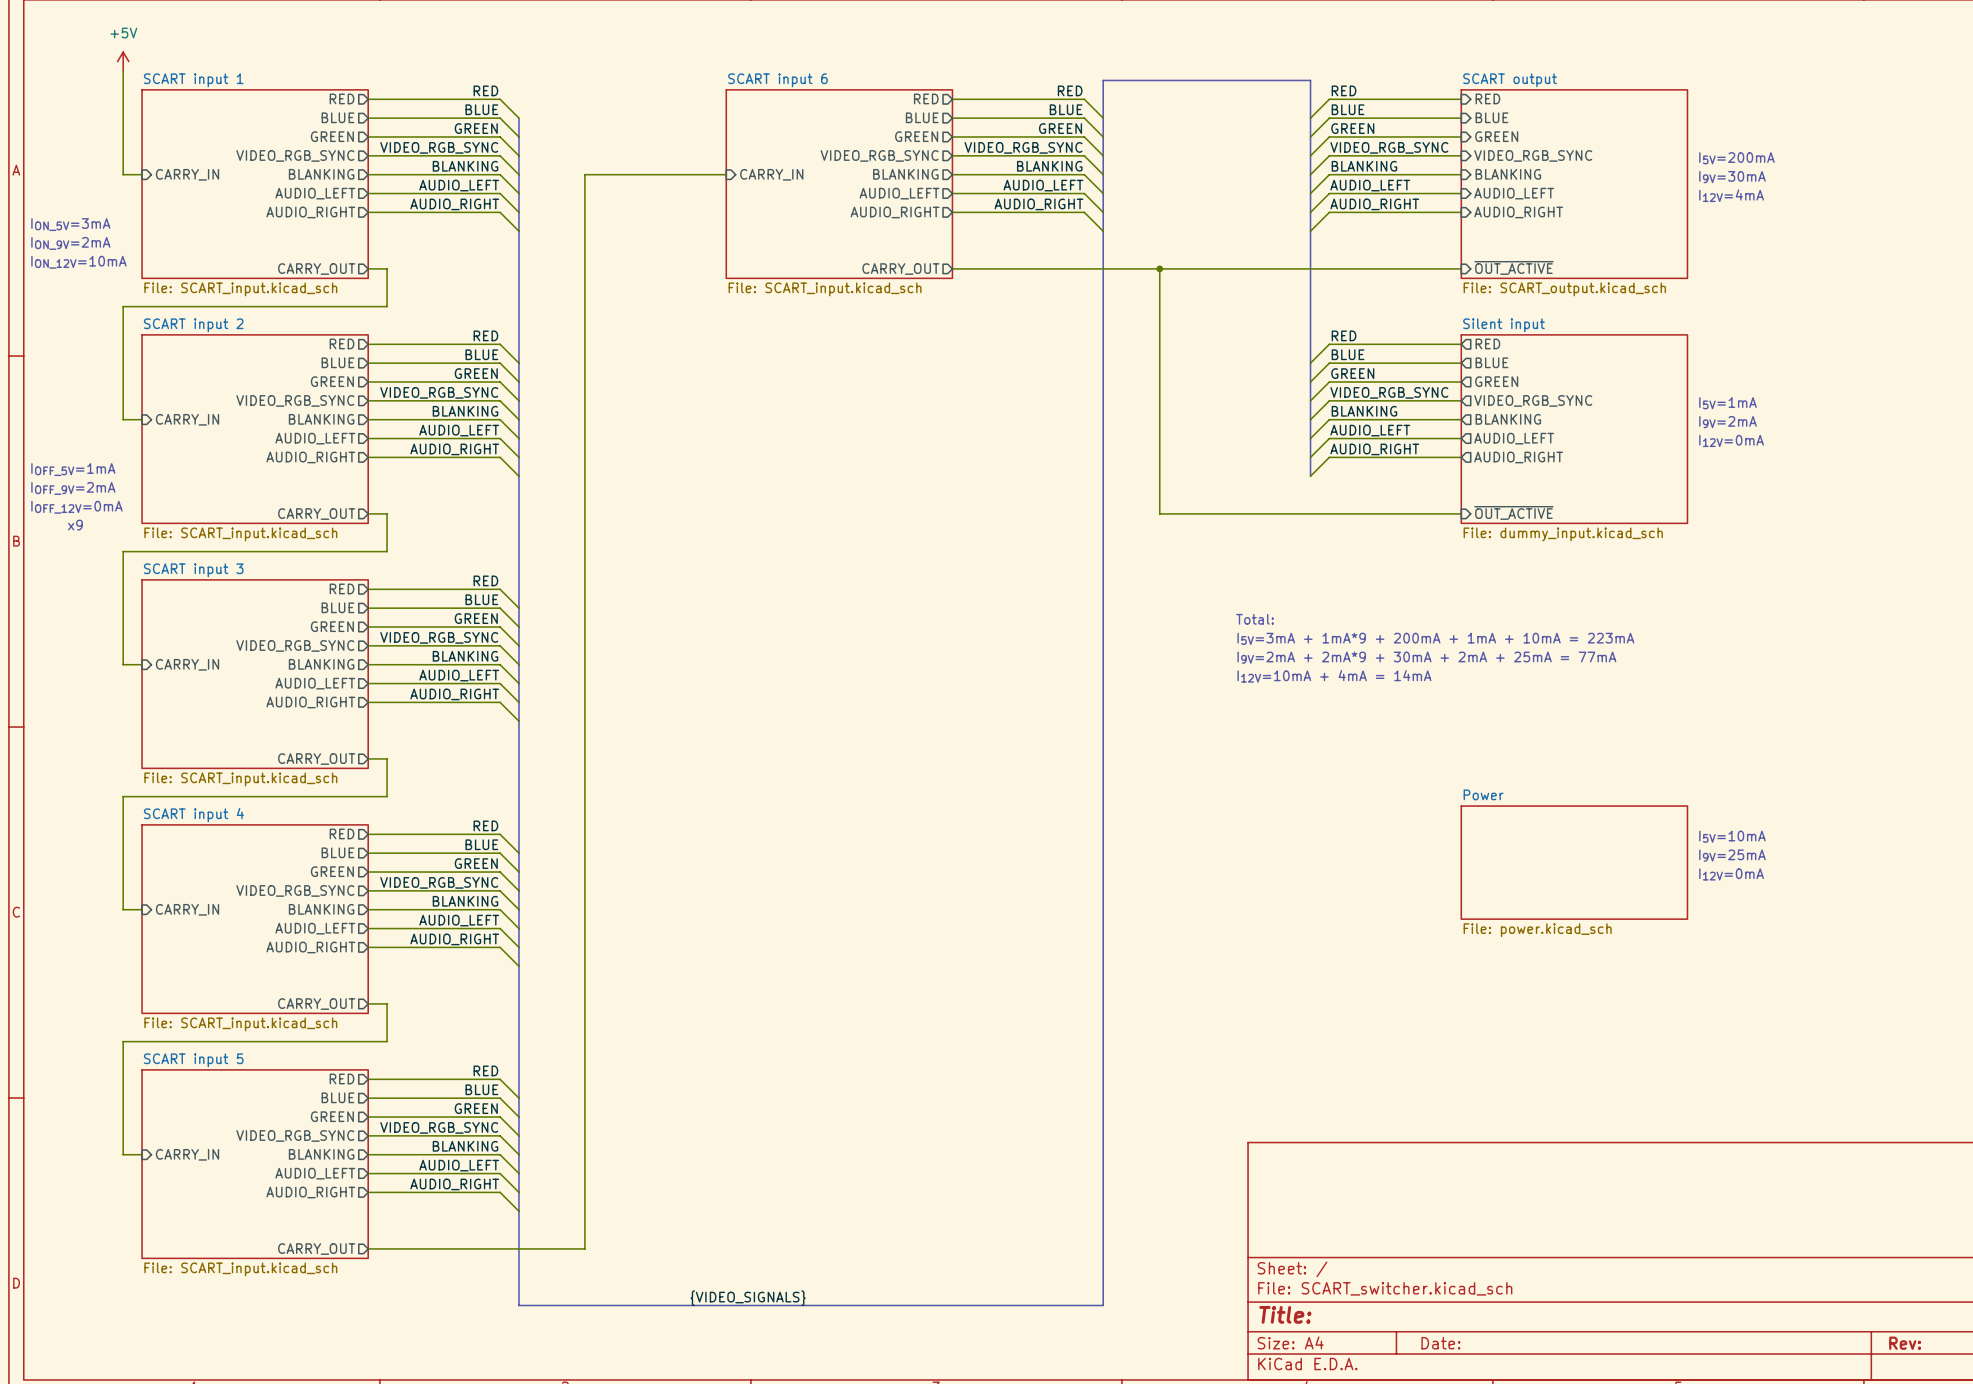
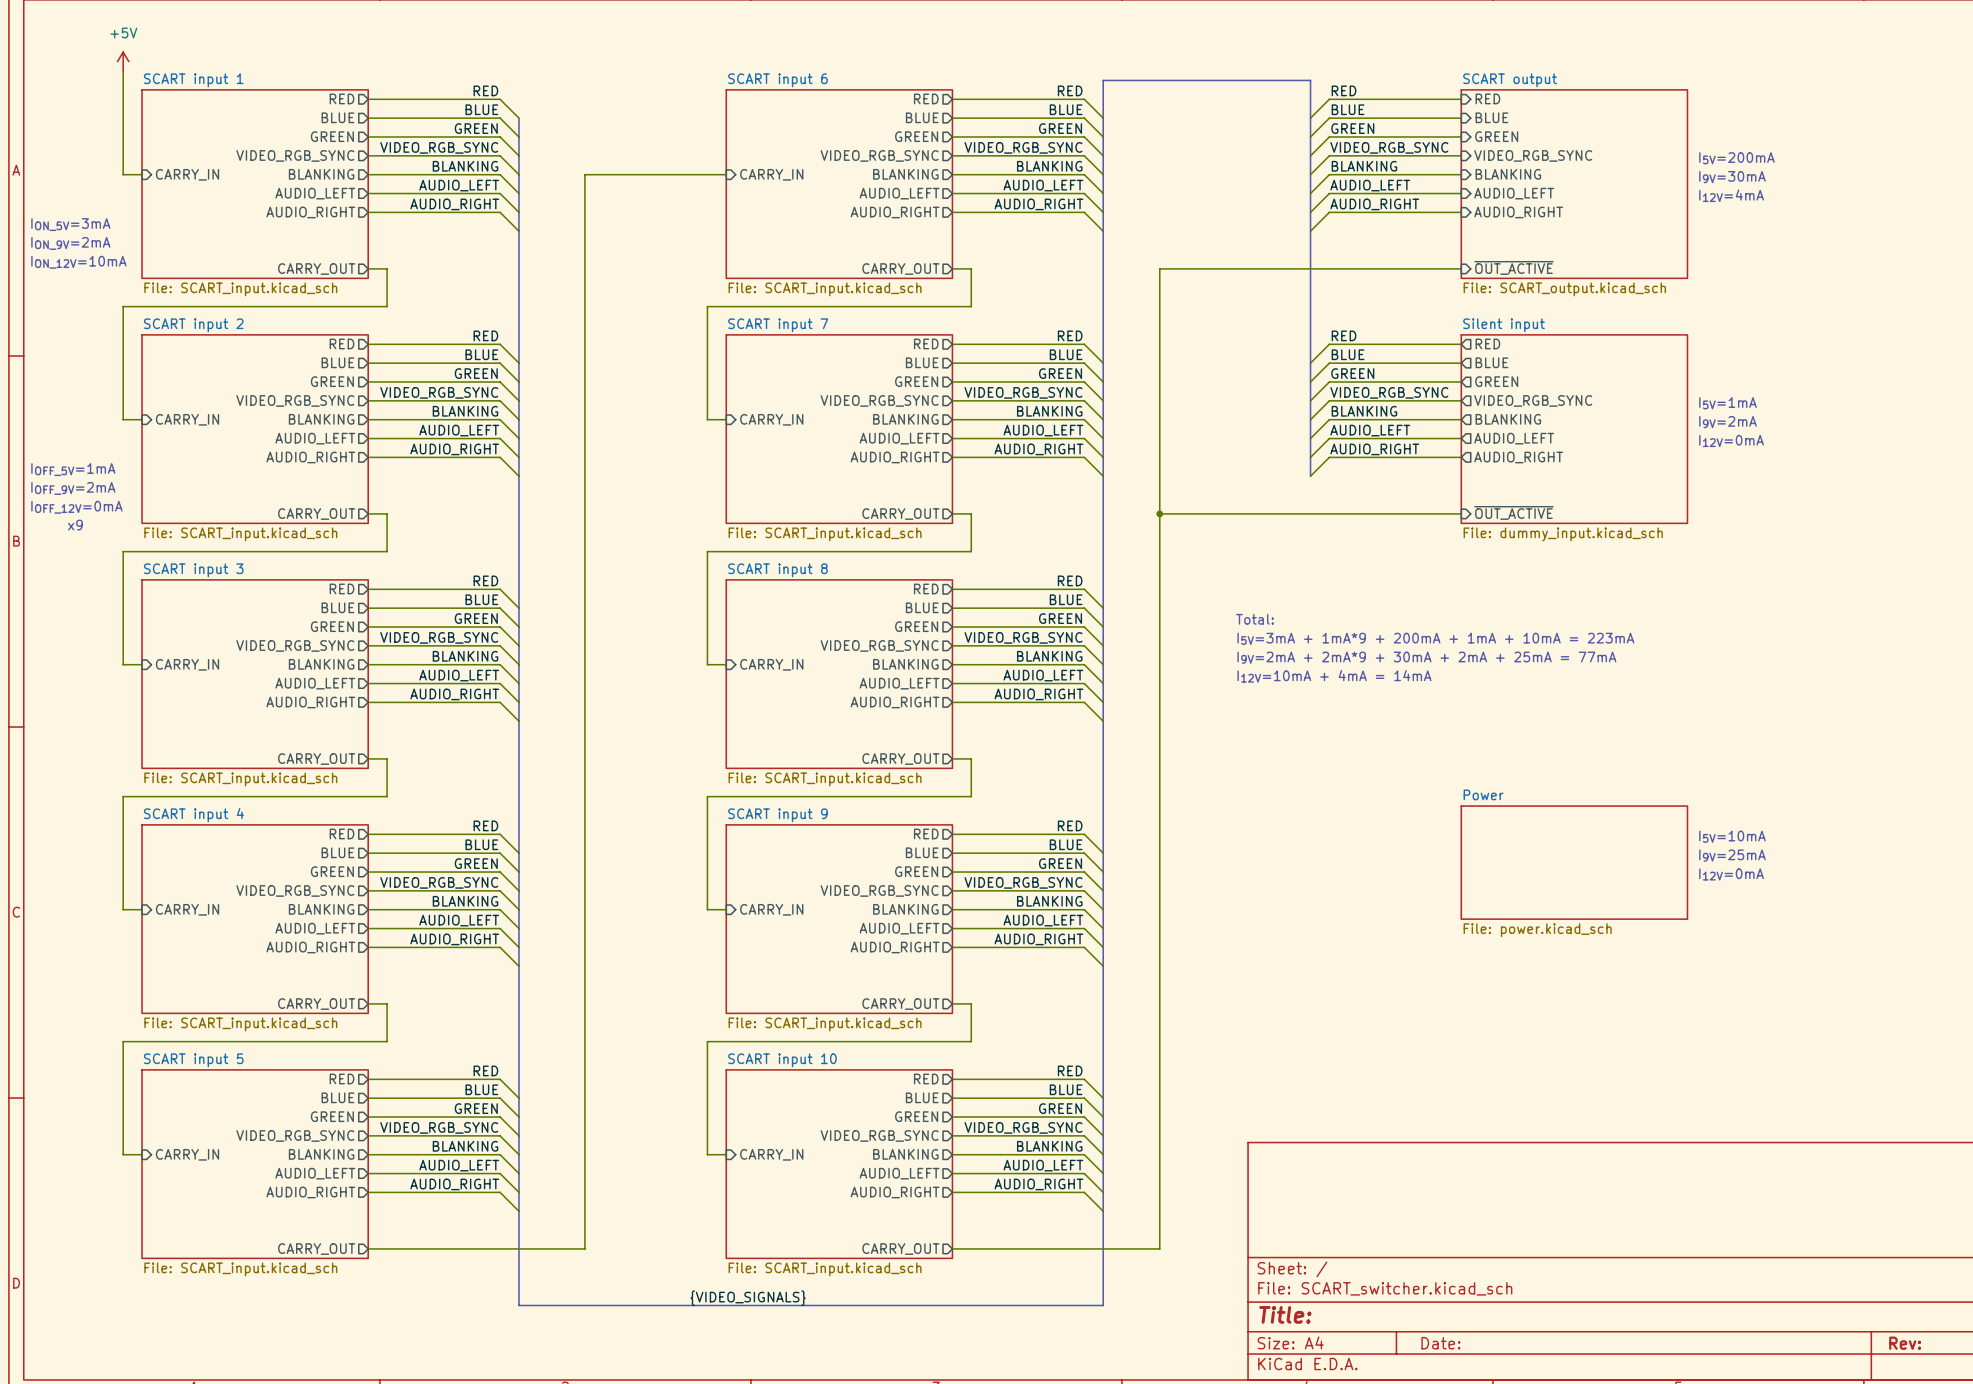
wire: (971, 268) (1159, 268) -> (971, 268) (971, 306) (707, 306) (707, 419) (726, 419)
junction: (1159, 268) -> none
label: none -> RED (1070, 335)
sheet pin: none -> RED (926, 343)
wire: none -> (952, 344) (1084, 344) (1103, 363)
label: none -> BLUE (1066, 354)
sheet pin: none -> BLUE (922, 362)
wire: none -> (952, 363) (1084, 363) (1103, 382)
label: none -> GREEN (1060, 373)
sheet pin: none -> GREEN (916, 381)
wire: none -> (952, 382) (1084, 382) (1103, 400)
label: none -> VIDEO_RGB_SYNC (1023, 392)
sheet pin: none -> VIDEO_RGB_SYNC (879, 400)
wire: none -> (952, 400) (1084, 400) (1103, 419)
label: none -> BLANKING (1049, 411)
sheet pin: none -> CARRY_IN (771, 419)
sheet pin: none -> BLANKING (905, 419)
wire: none -> (952, 419) (1084, 419) (1103, 438)
sheet SCART input 7: none -> File: SCART_input.kicad_sch (839, 429)
label: none -> AUDIO_LEFT (1043, 430)
sheet pin: none -> AUDIO_LEFT (899, 438)
wire: none -> (952, 438) (1084, 438) (1103, 457)
label: none -> AUDIO_RIGHT (1038, 449)
sheet pin: none -> AUDIO_RIGHT (895, 457)
wire: none -> (952, 457) (1084, 457) (1103, 476)
wire: none -> (952, 513) (971, 513) (971, 551) (707, 551) (707, 664) (726, 664)
wire: none -> (1159, 513) (1159, 1248) (952, 1248)
junction: none -> (1159, 513)
sheet pin: none -> CARRY_OUT (900, 514)
label: none -> RED (1070, 580)
sheet pin: none -> RED (926, 588)
wire: none -> (952, 589) (1084, 589) (1103, 608)
label: none -> BLUE (1066, 599)
sheet pin: none -> BLUE (922, 607)
wire: none -> (952, 608) (1084, 608) (1103, 627)
label: none -> GREEN (1060, 618)
sheet pin: none -> GREEN (916, 626)
wire: none -> (952, 627) (1084, 627) (1103, 645)
label: none -> VIDEO_RGB_SYNC (1023, 637)
sheet pin: none -> VIDEO_RGB_SYNC (879, 645)
wire: none -> (952, 645) (1084, 645) (1103, 664)
label: none -> BLANKING (1049, 656)
sheet pin: none -> CARRY_IN (771, 664)
sheet pin: none -> BLANKING (905, 664)
wire: none -> (952, 664) (1084, 664) (1103, 683)
sheet SCART input 8: none -> File: SCART_input.kicad_sch (839, 674)
label: none -> AUDIO_LEFT (1043, 675)
sheet pin: none -> AUDIO_LEFT (899, 683)
wire: none -> (952, 683) (1084, 683) (1103, 702)
label: none -> AUDIO_RIGHT (1038, 694)
sheet pin: none -> AUDIO_RIGHT (895, 702)
wire: none -> (952, 702) (1084, 702) (1103, 721)
wire: none -> (952, 758) (971, 758) (971, 796) (707, 796) (707, 909) (726, 909)
sheet pin: none -> CARRY_OUT (900, 759)
label: none -> RED (1070, 825)
sheet pin: none -> RED (926, 833)
wire: none -> (952, 834) (1084, 834) (1103, 853)
label: none -> BLUE (1066, 844)
sheet pin: none -> BLUE (922, 852)
wire: none -> (952, 853) (1084, 853) (1103, 872)
label: none -> GREEN (1060, 863)
sheet pin: none -> GREEN (916, 871)
wire: none -> (952, 872) (1084, 872) (1103, 890)
label: none -> VIDEO_RGB_SYNC (1023, 882)
sheet pin: none -> VIDEO_RGB_SYNC (879, 890)
wire: none -> (952, 890) (1084, 890) (1103, 909)
label: none -> BLANKING (1049, 901)
sheet pin: none -> CARRY_IN (771, 909)
sheet pin: none -> BLANKING (905, 909)
wire: none -> (952, 909) (1084, 909) (1103, 928)
sheet SCART input 9: none -> File: SCART_input.kicad_sch (839, 919)
label: none -> AUDIO_LEFT (1043, 920)
sheet pin: none -> AUDIO_LEFT (899, 928)
wire: none -> (952, 928) (1084, 928) (1103, 947)
label: none -> AUDIO_RIGHT (1038, 939)
sheet pin: none -> AUDIO_RIGHT (895, 947)
wire: none -> (952, 947) (1084, 947) (1103, 966)
wire: none -> (952, 1003) (971, 1003) (971, 1041) (707, 1041) (707, 1154) (726, 1154)
sheet pin: none -> CARRY_OUT (900, 1004)
label: none -> RED (1070, 1070)
sheet pin: none -> RED (926, 1078)
wire: none -> (952, 1079) (1084, 1079) (1103, 1098)
label: none -> BLUE (1066, 1089)
sheet pin: none -> BLUE (922, 1097)
wire: none -> (952, 1098) (1084, 1098) (1103, 1117)
label: none -> GREEN (1060, 1108)
sheet pin: none -> GREEN (916, 1116)
wire: none -> (952, 1117) (1084, 1117) (1103, 1135)
label: none -> VIDEO_RGB_SYNC (1023, 1127)
sheet pin: none -> VIDEO_RGB_SYNC (879, 1135)
wire: none -> (952, 1135) (1084, 1135) (1103, 1154)
label: none -> BLANKING (1049, 1146)
sheet pin: none -> CARRY_IN (771, 1154)
sheet pin: none -> BLANKING (905, 1154)
wire: none -> (952, 1154) (1084, 1154) (1103, 1173)
sheet SCART input 10: none -> File: SCART_input.kicad_sch (839, 1164)
label: none -> AUDIO_LEFT (1043, 1165)
sheet pin: none -> AUDIO_LEFT (899, 1173)
wire: none -> (952, 1173) (1084, 1173) (1103, 1192)
label: none -> AUDIO_RIGHT (1038, 1184)
sheet pin: none -> AUDIO_RIGHT (895, 1192)
wire: none -> (952, 1192) (1084, 1192) (1103, 1211)
sheet pin: none -> CARRY_OUT (900, 1249)

